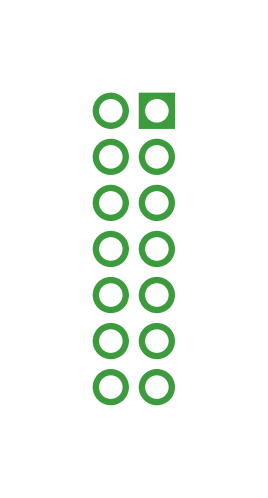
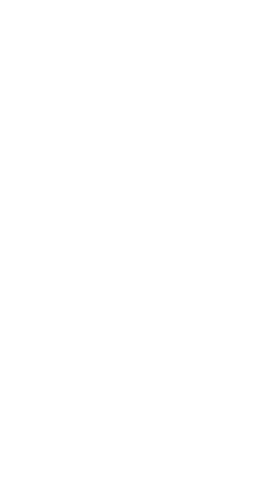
part: (133, 248) -> none

